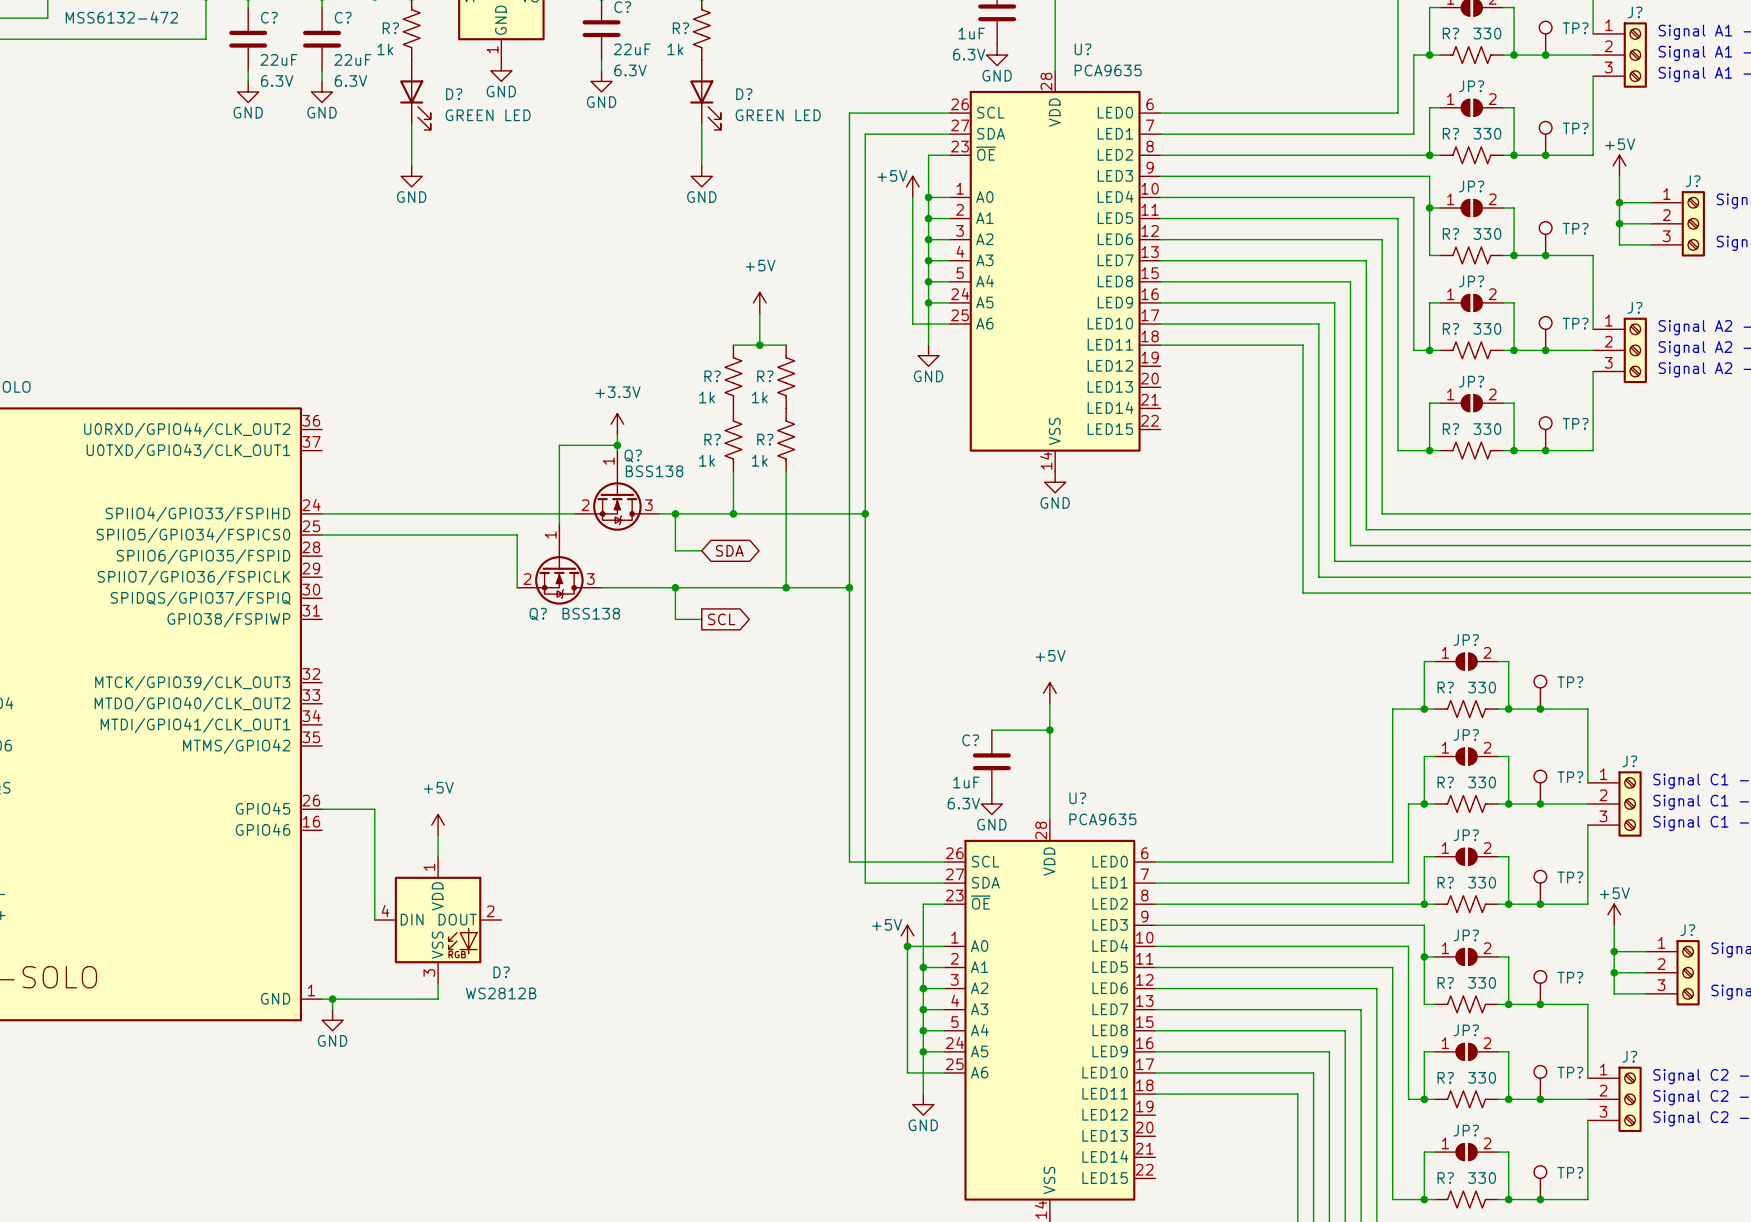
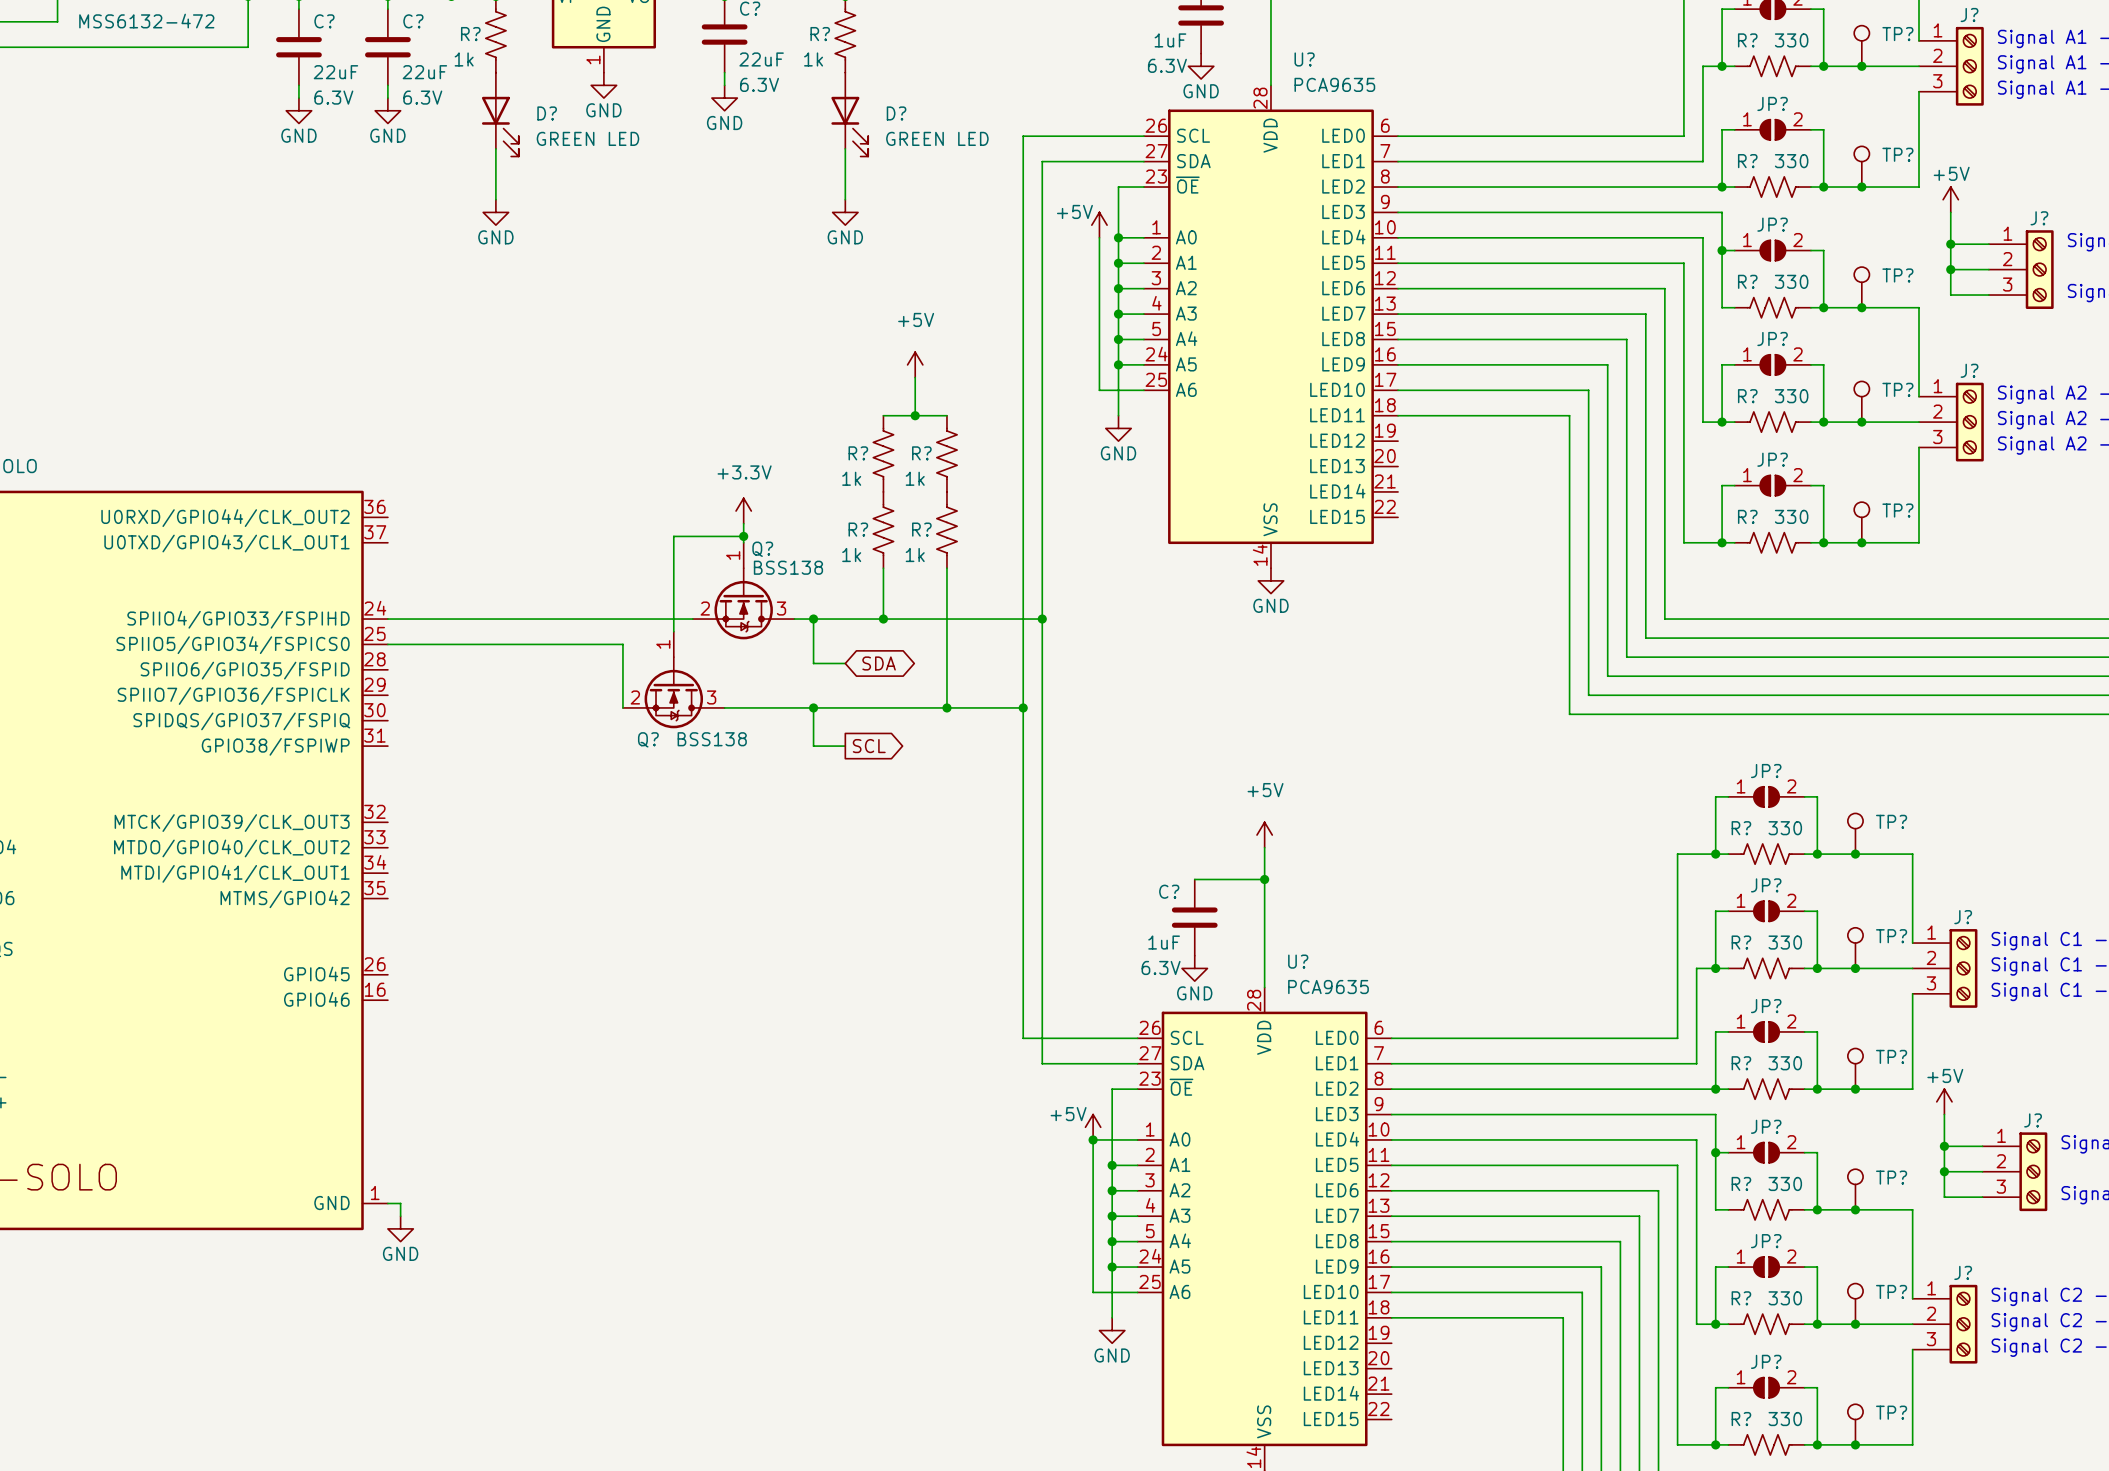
wire: (322, 809) (374, 809) (374, 920) -> none
power symbol: +5V (438, 825) -> none
wire: (438, 835) (438, 856) -> none
D?: WS2812B (438, 920) -> none
wire: (438, 983) (438, 999) (332, 999) -> none
junction: (332, 999) -> none

